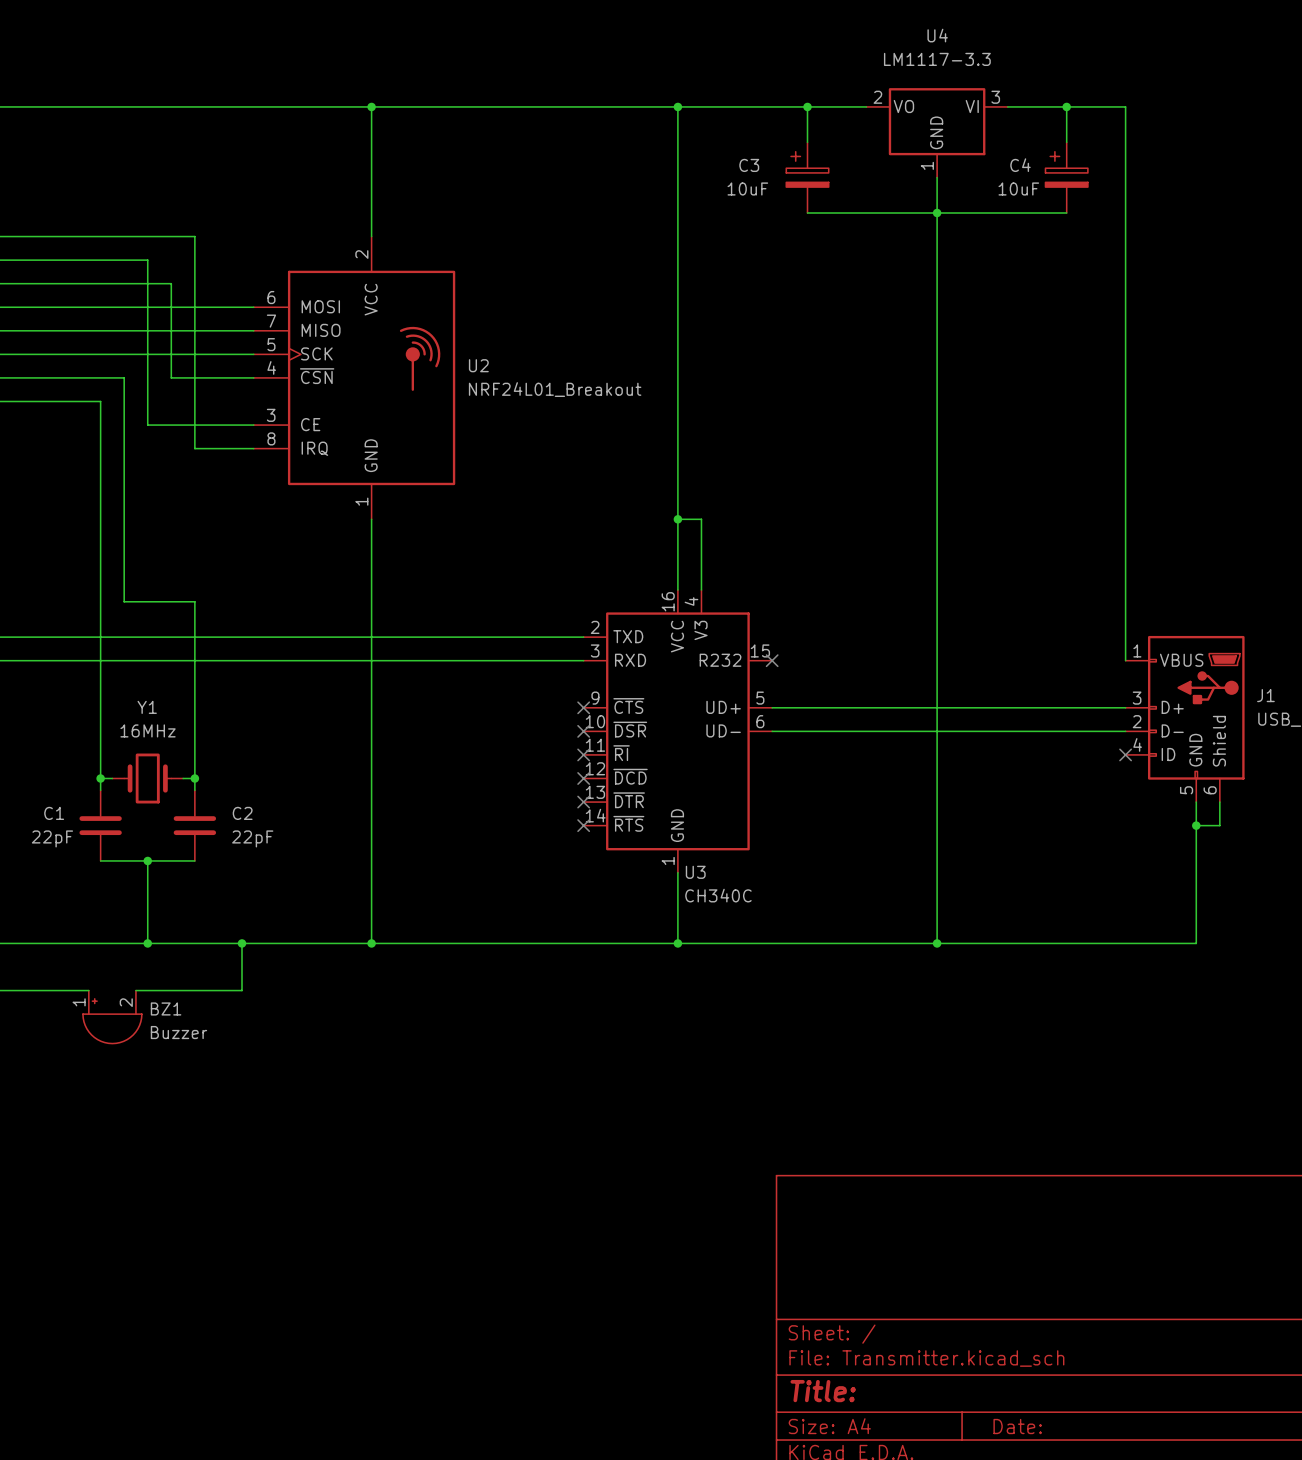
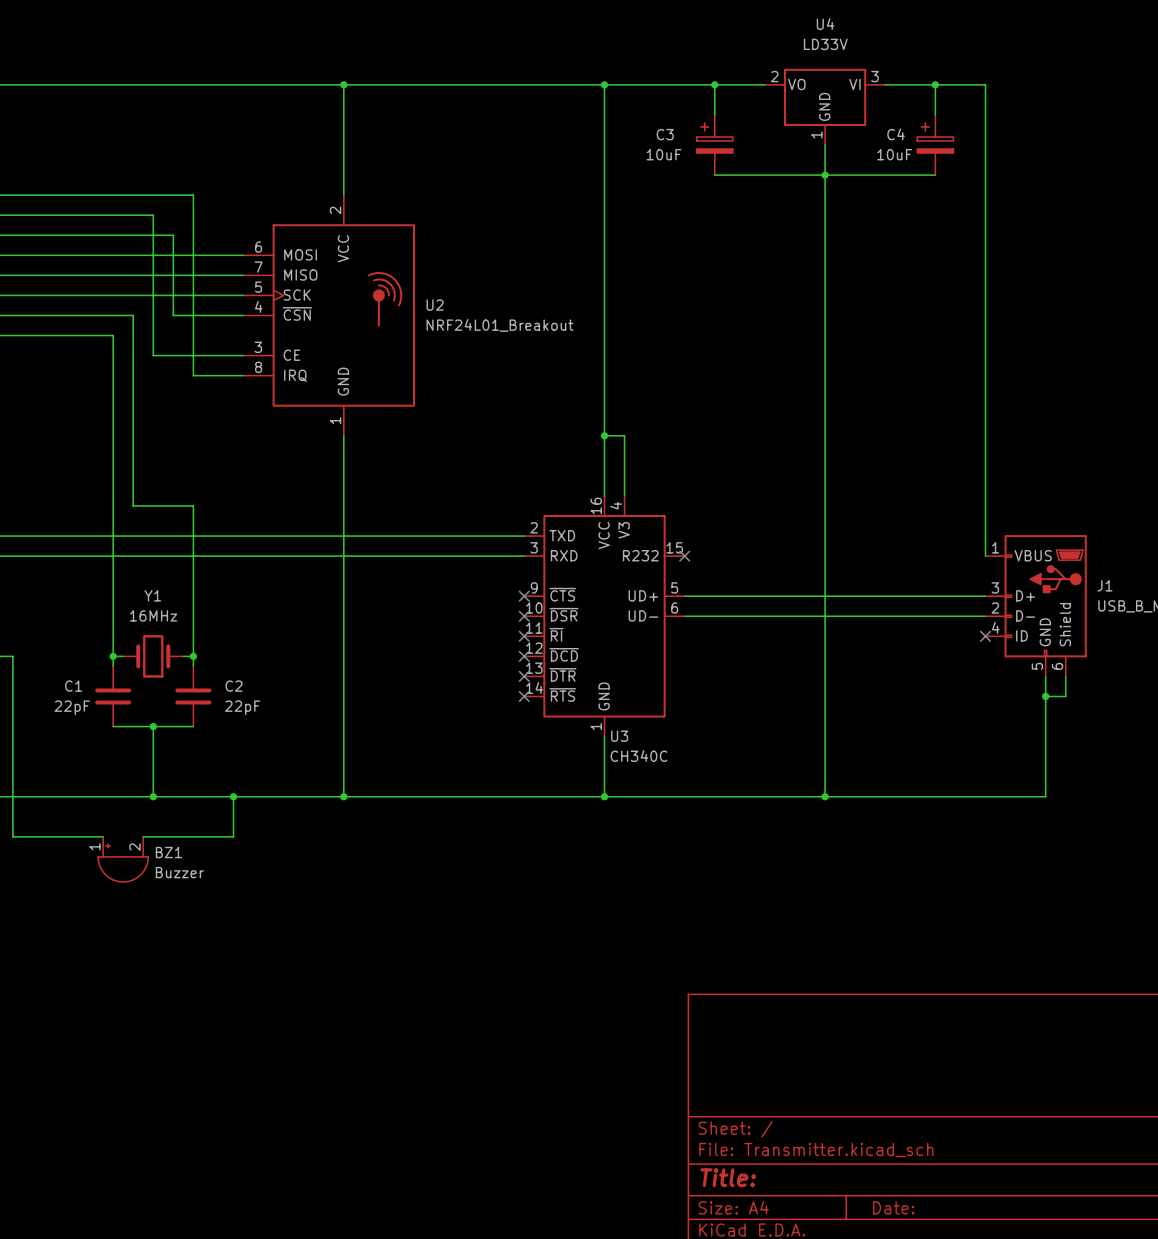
U4 value: LM1117-3.3 (937, 59) -> LD33V (825, 44)

